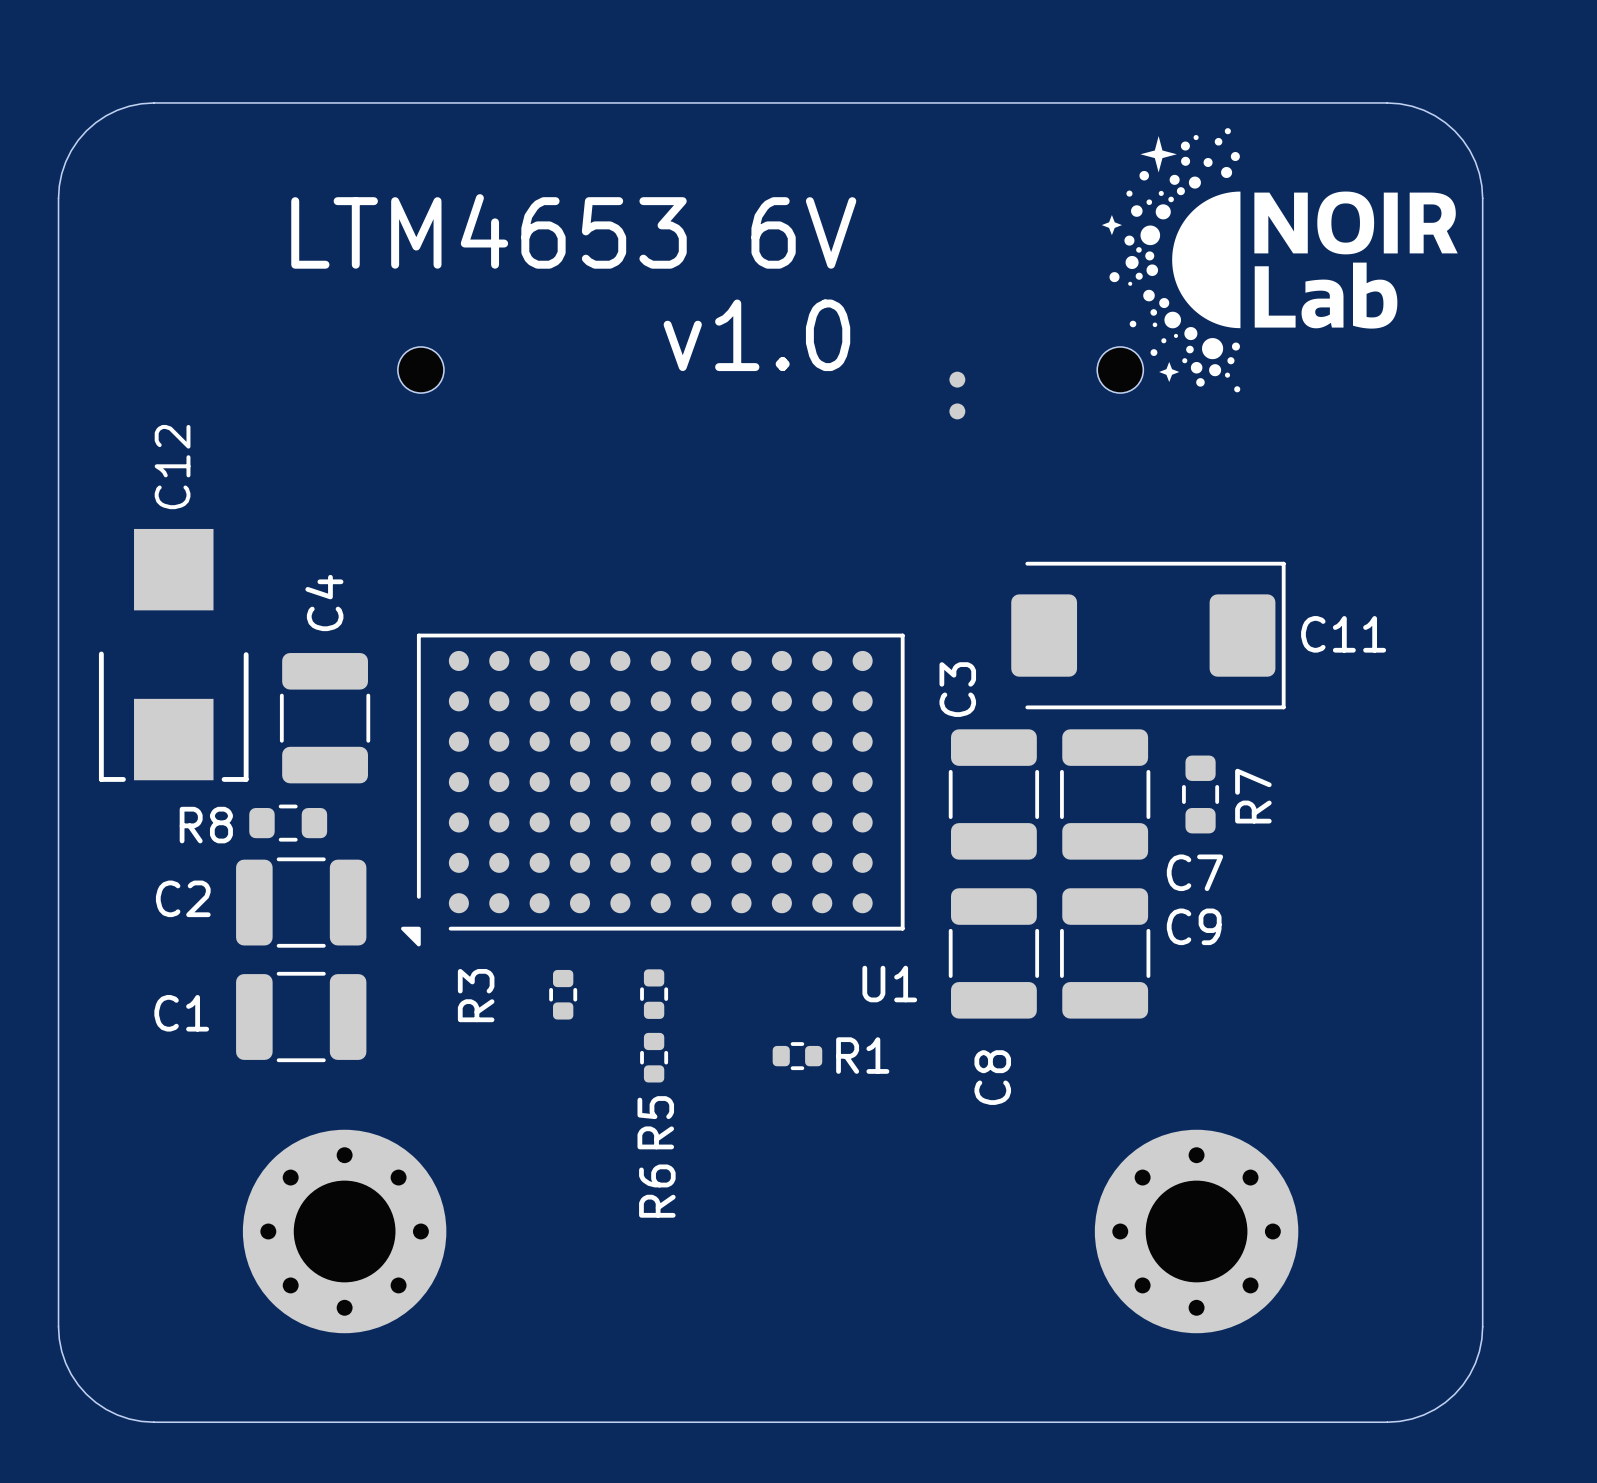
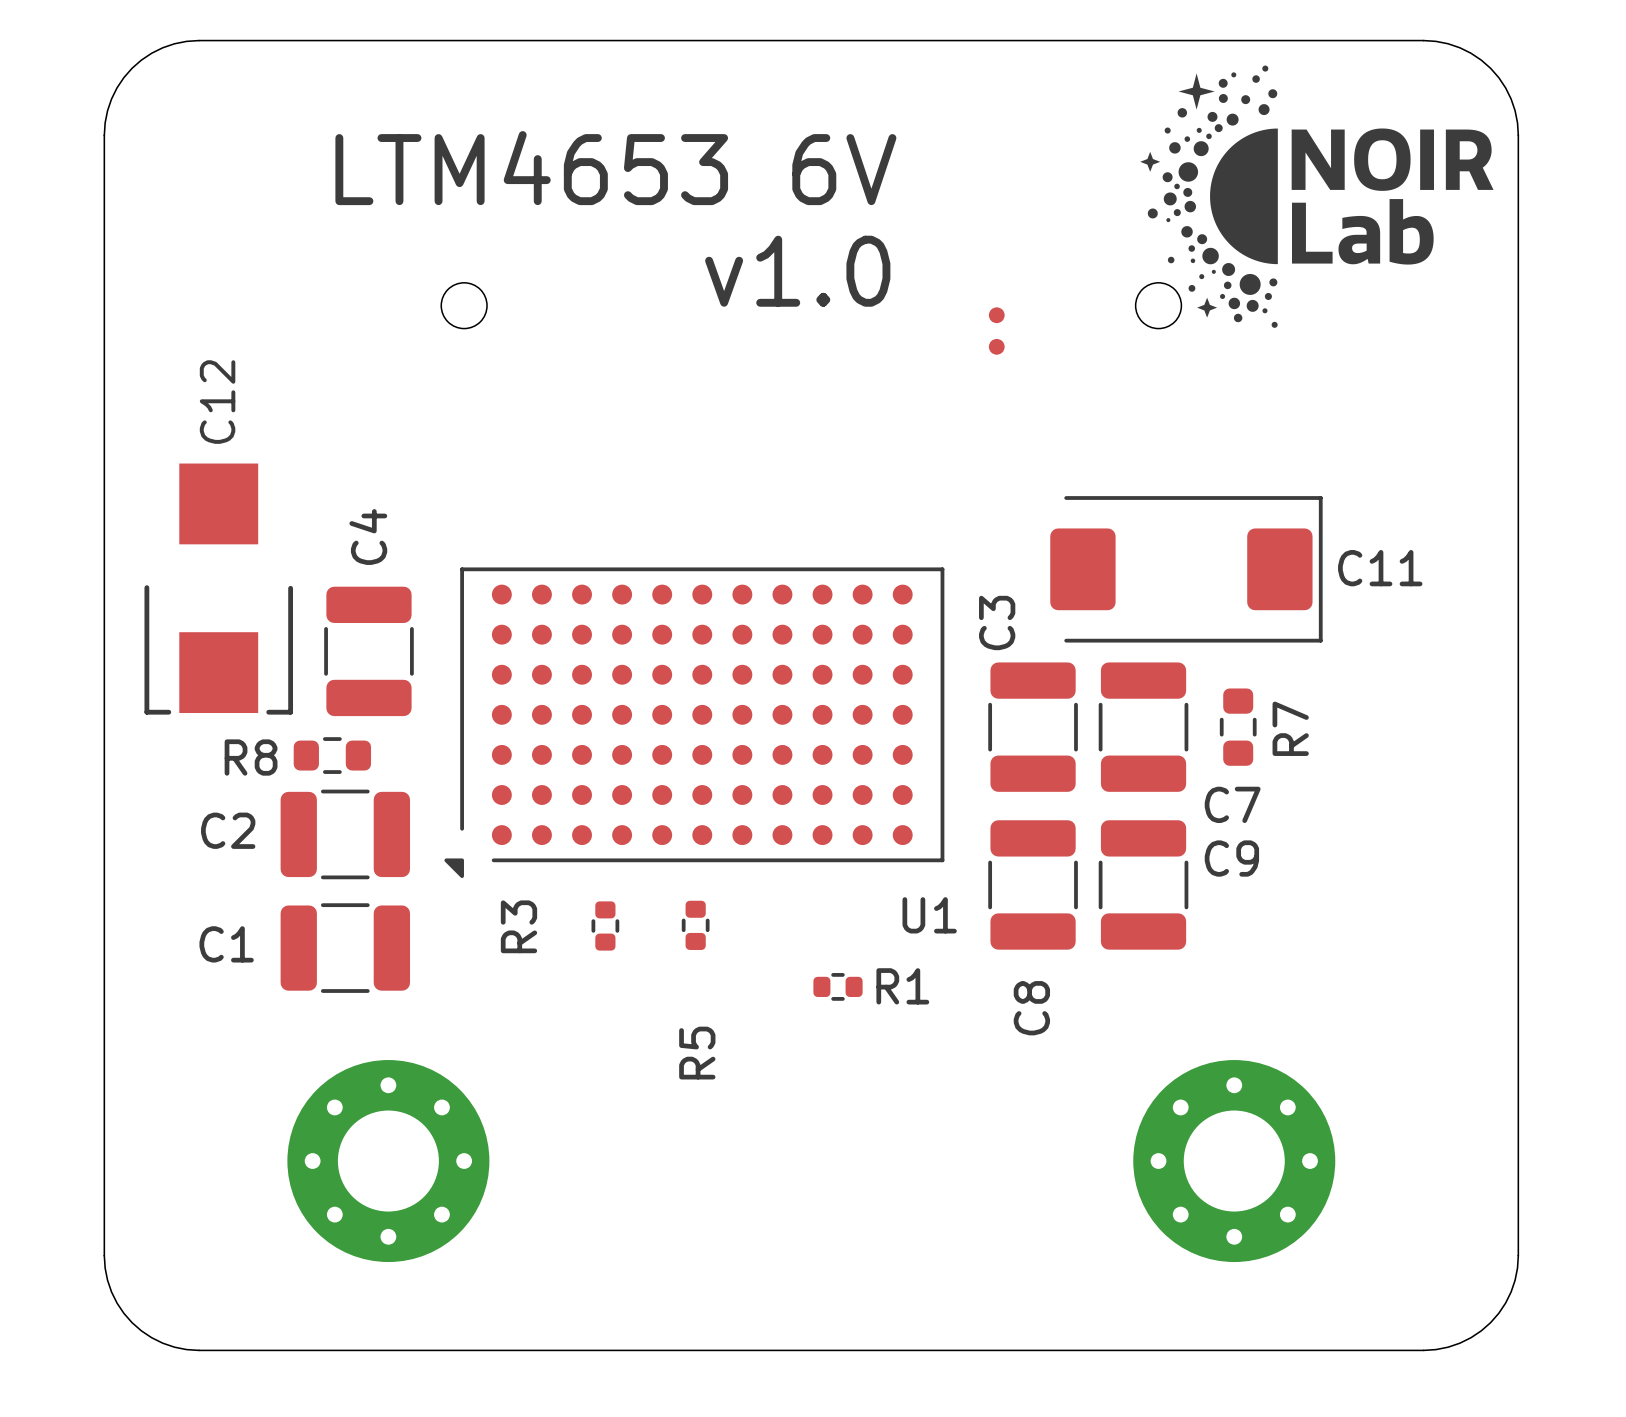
R6: (654, 1057) -> none

